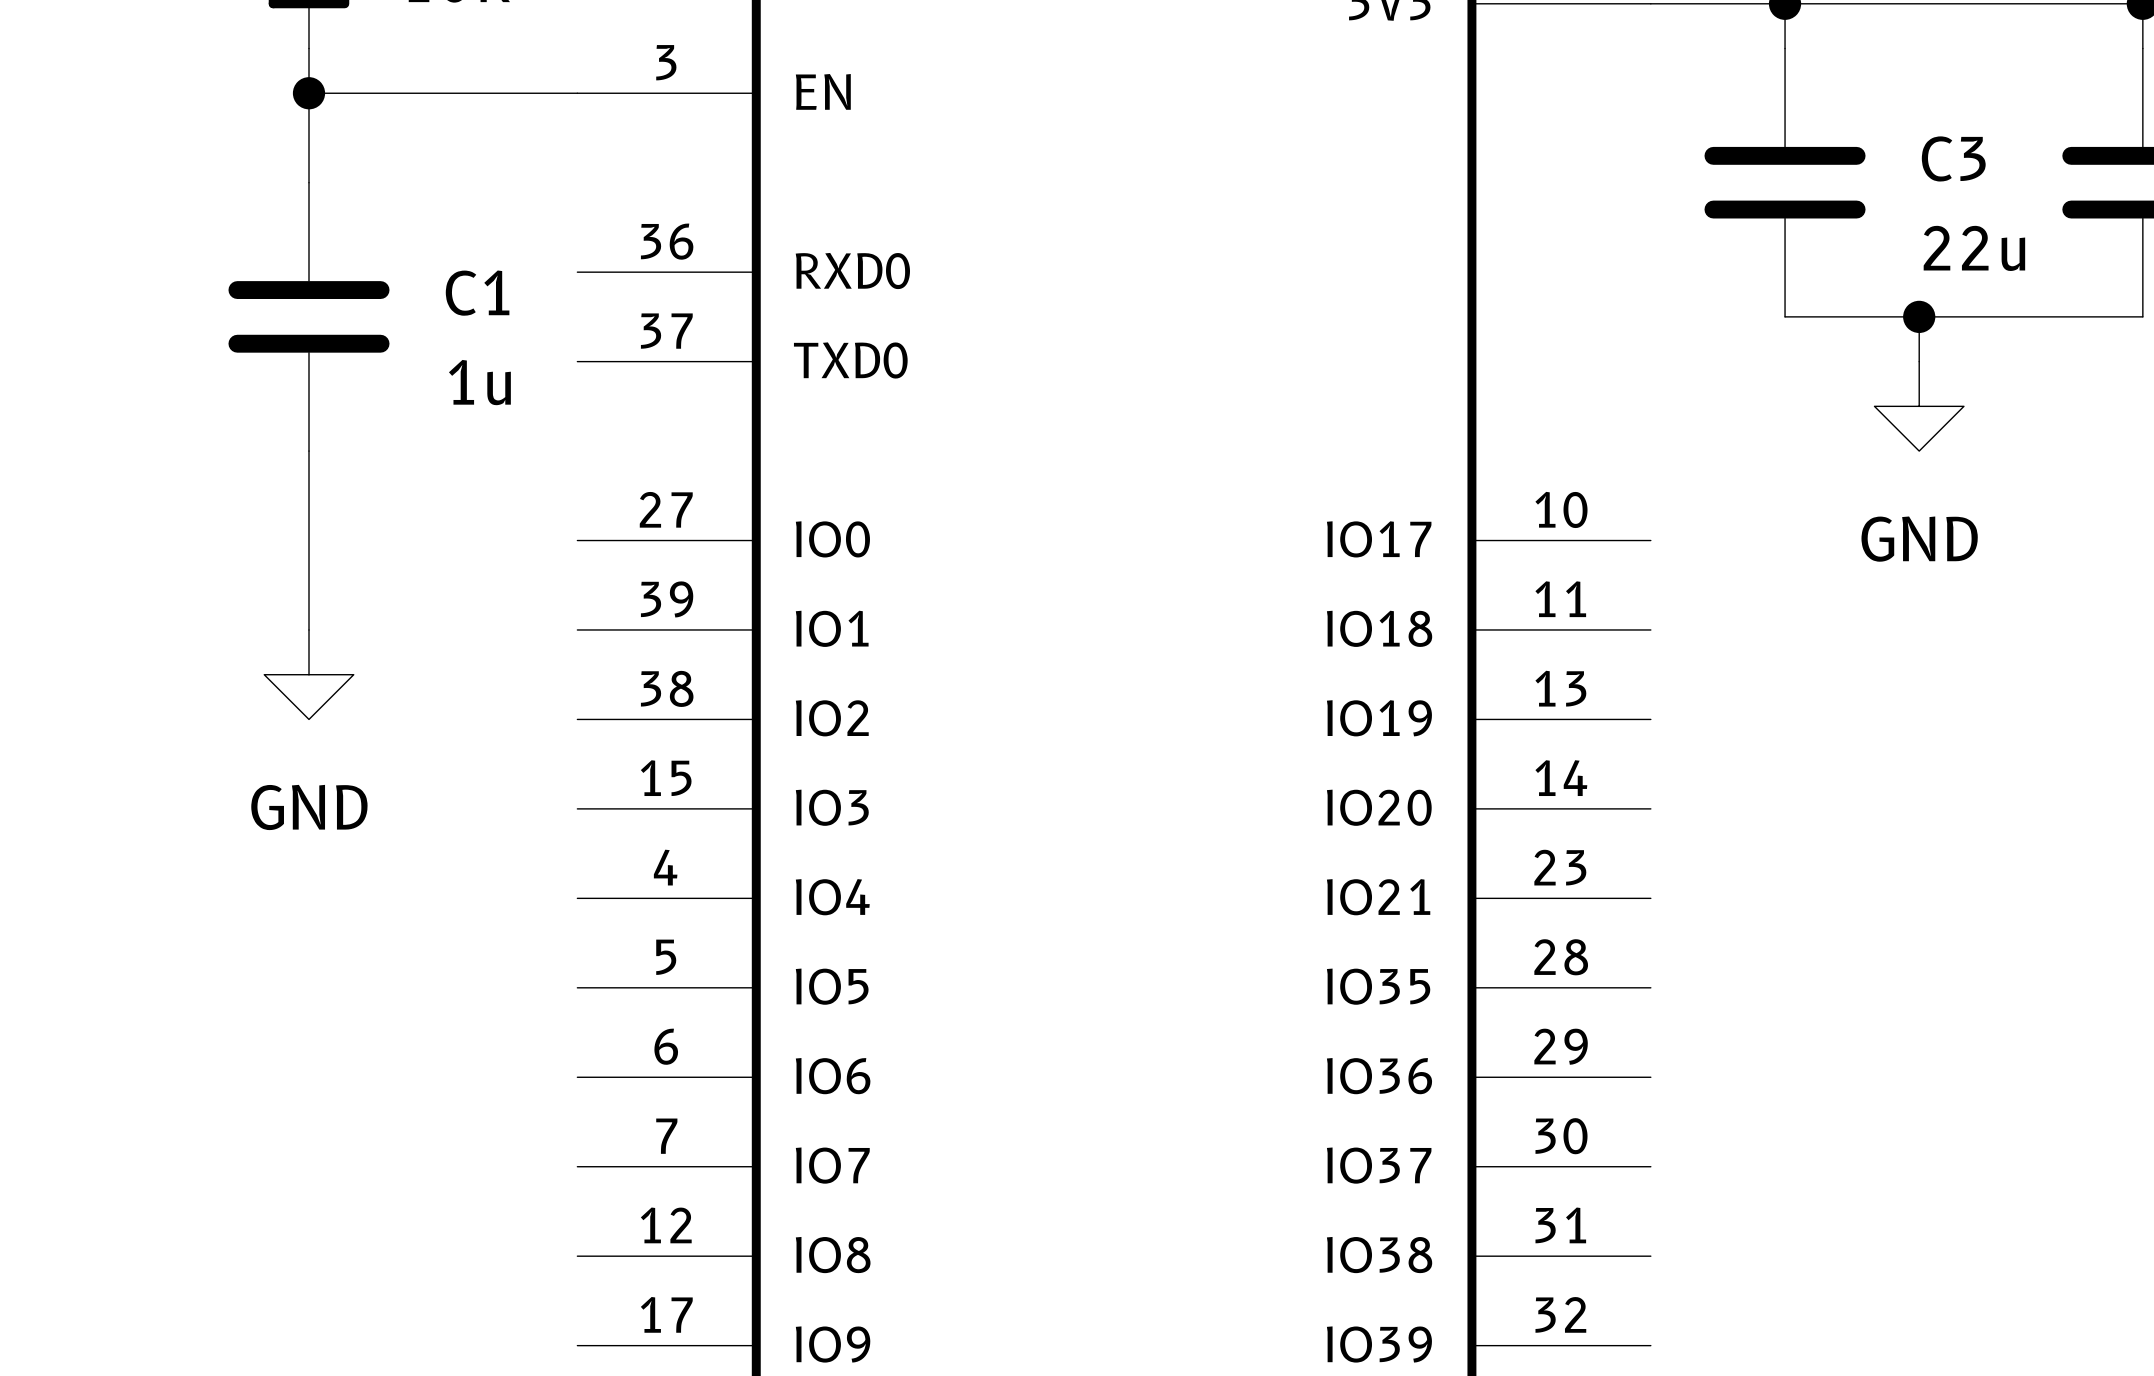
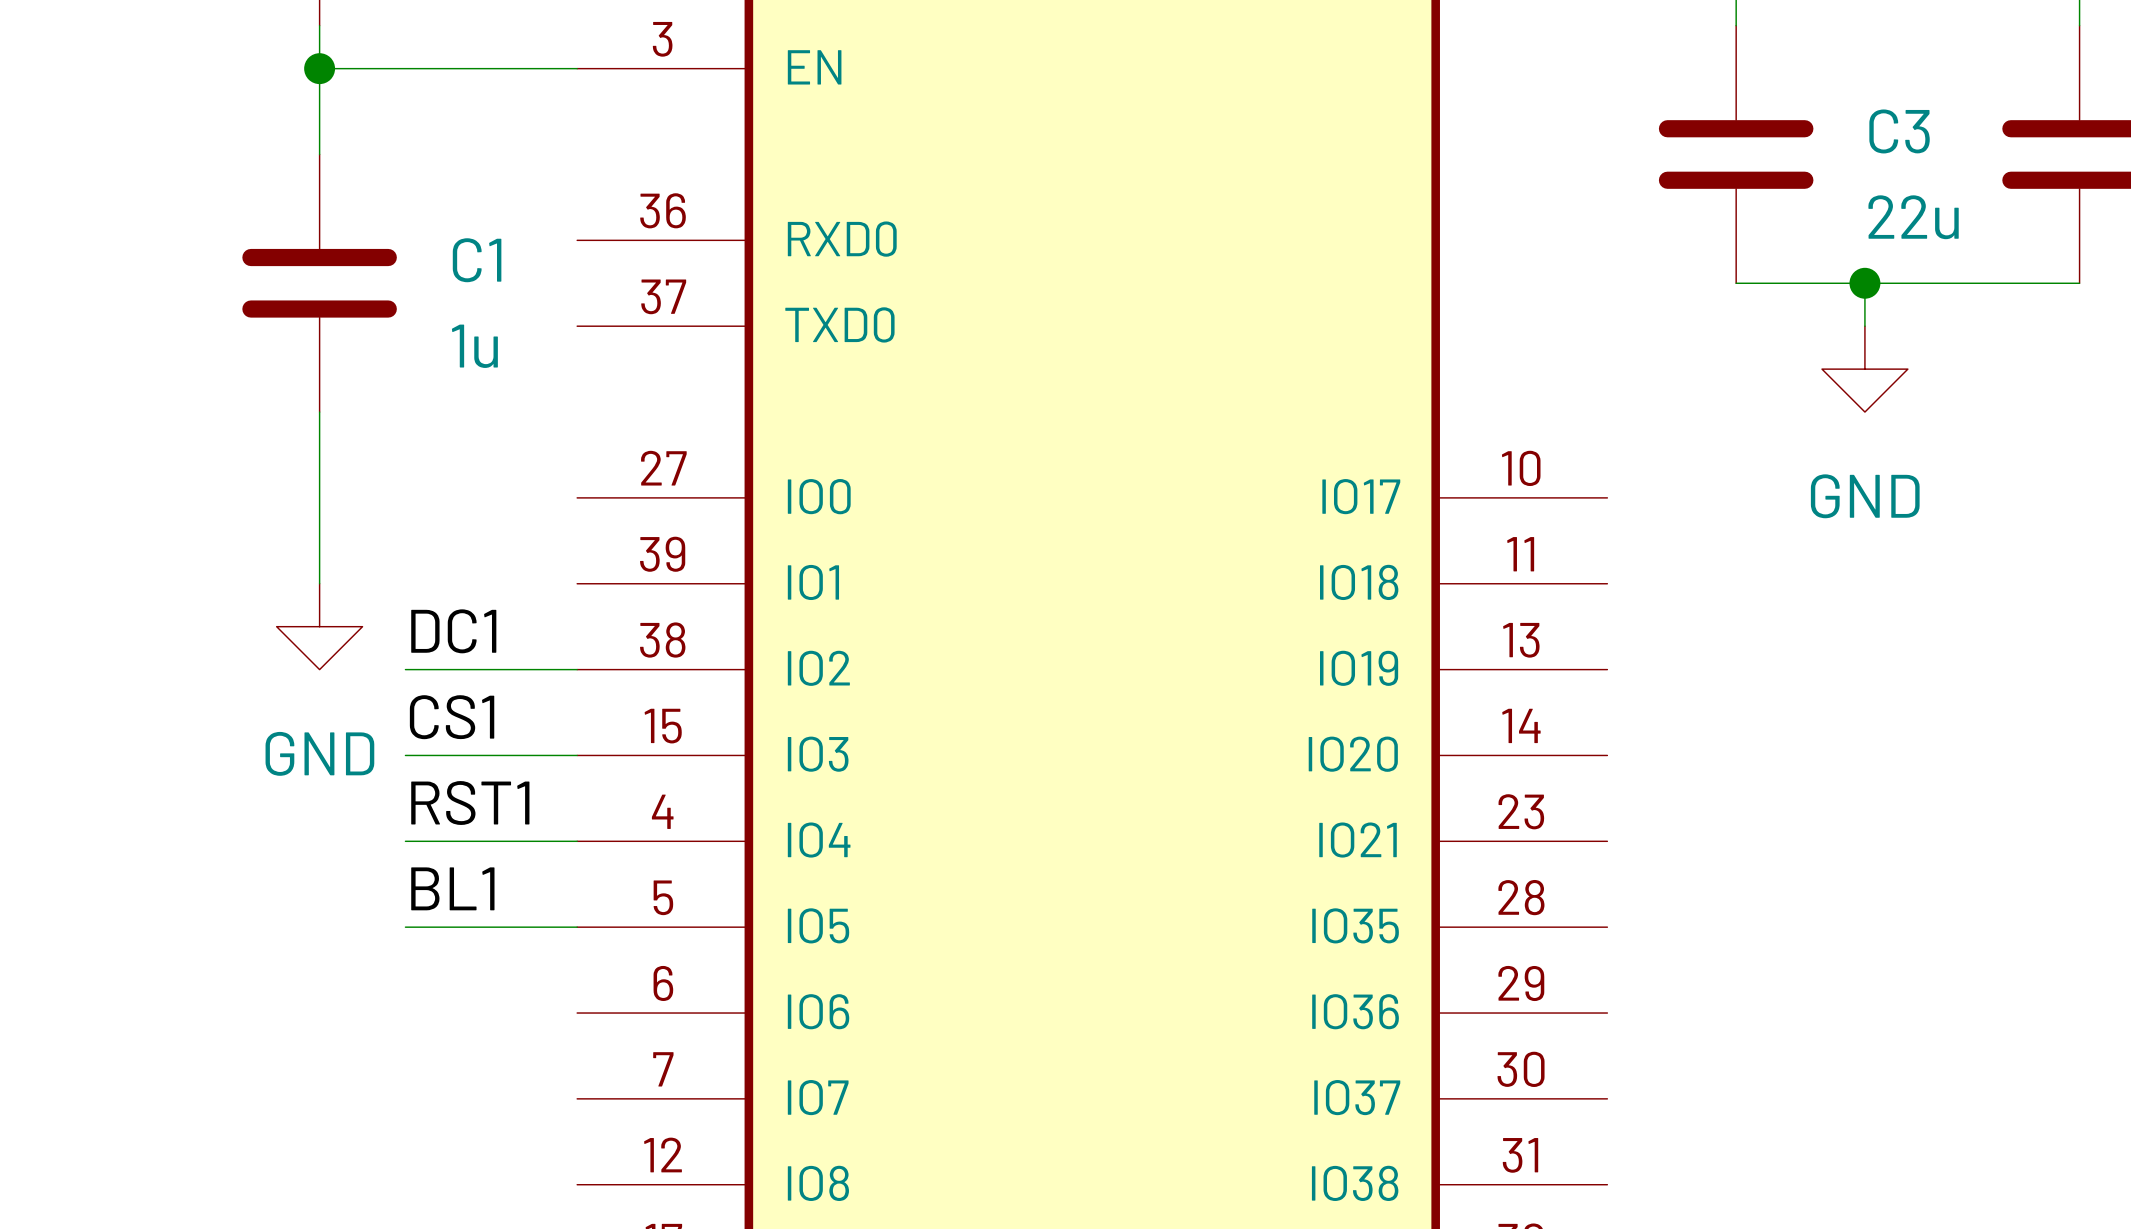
label: none -> DC1 (453, 631)
wire: none -> (405, 669) (577, 669)
label: none -> CS1 (452, 717)
wire: none -> (405, 755) (577, 755)
label: none -> RST1 (470, 803)
wire: none -> (405, 841) (577, 841)
label: none -> BL1 (452, 888)
wire: none -> (405, 927) (577, 927)

